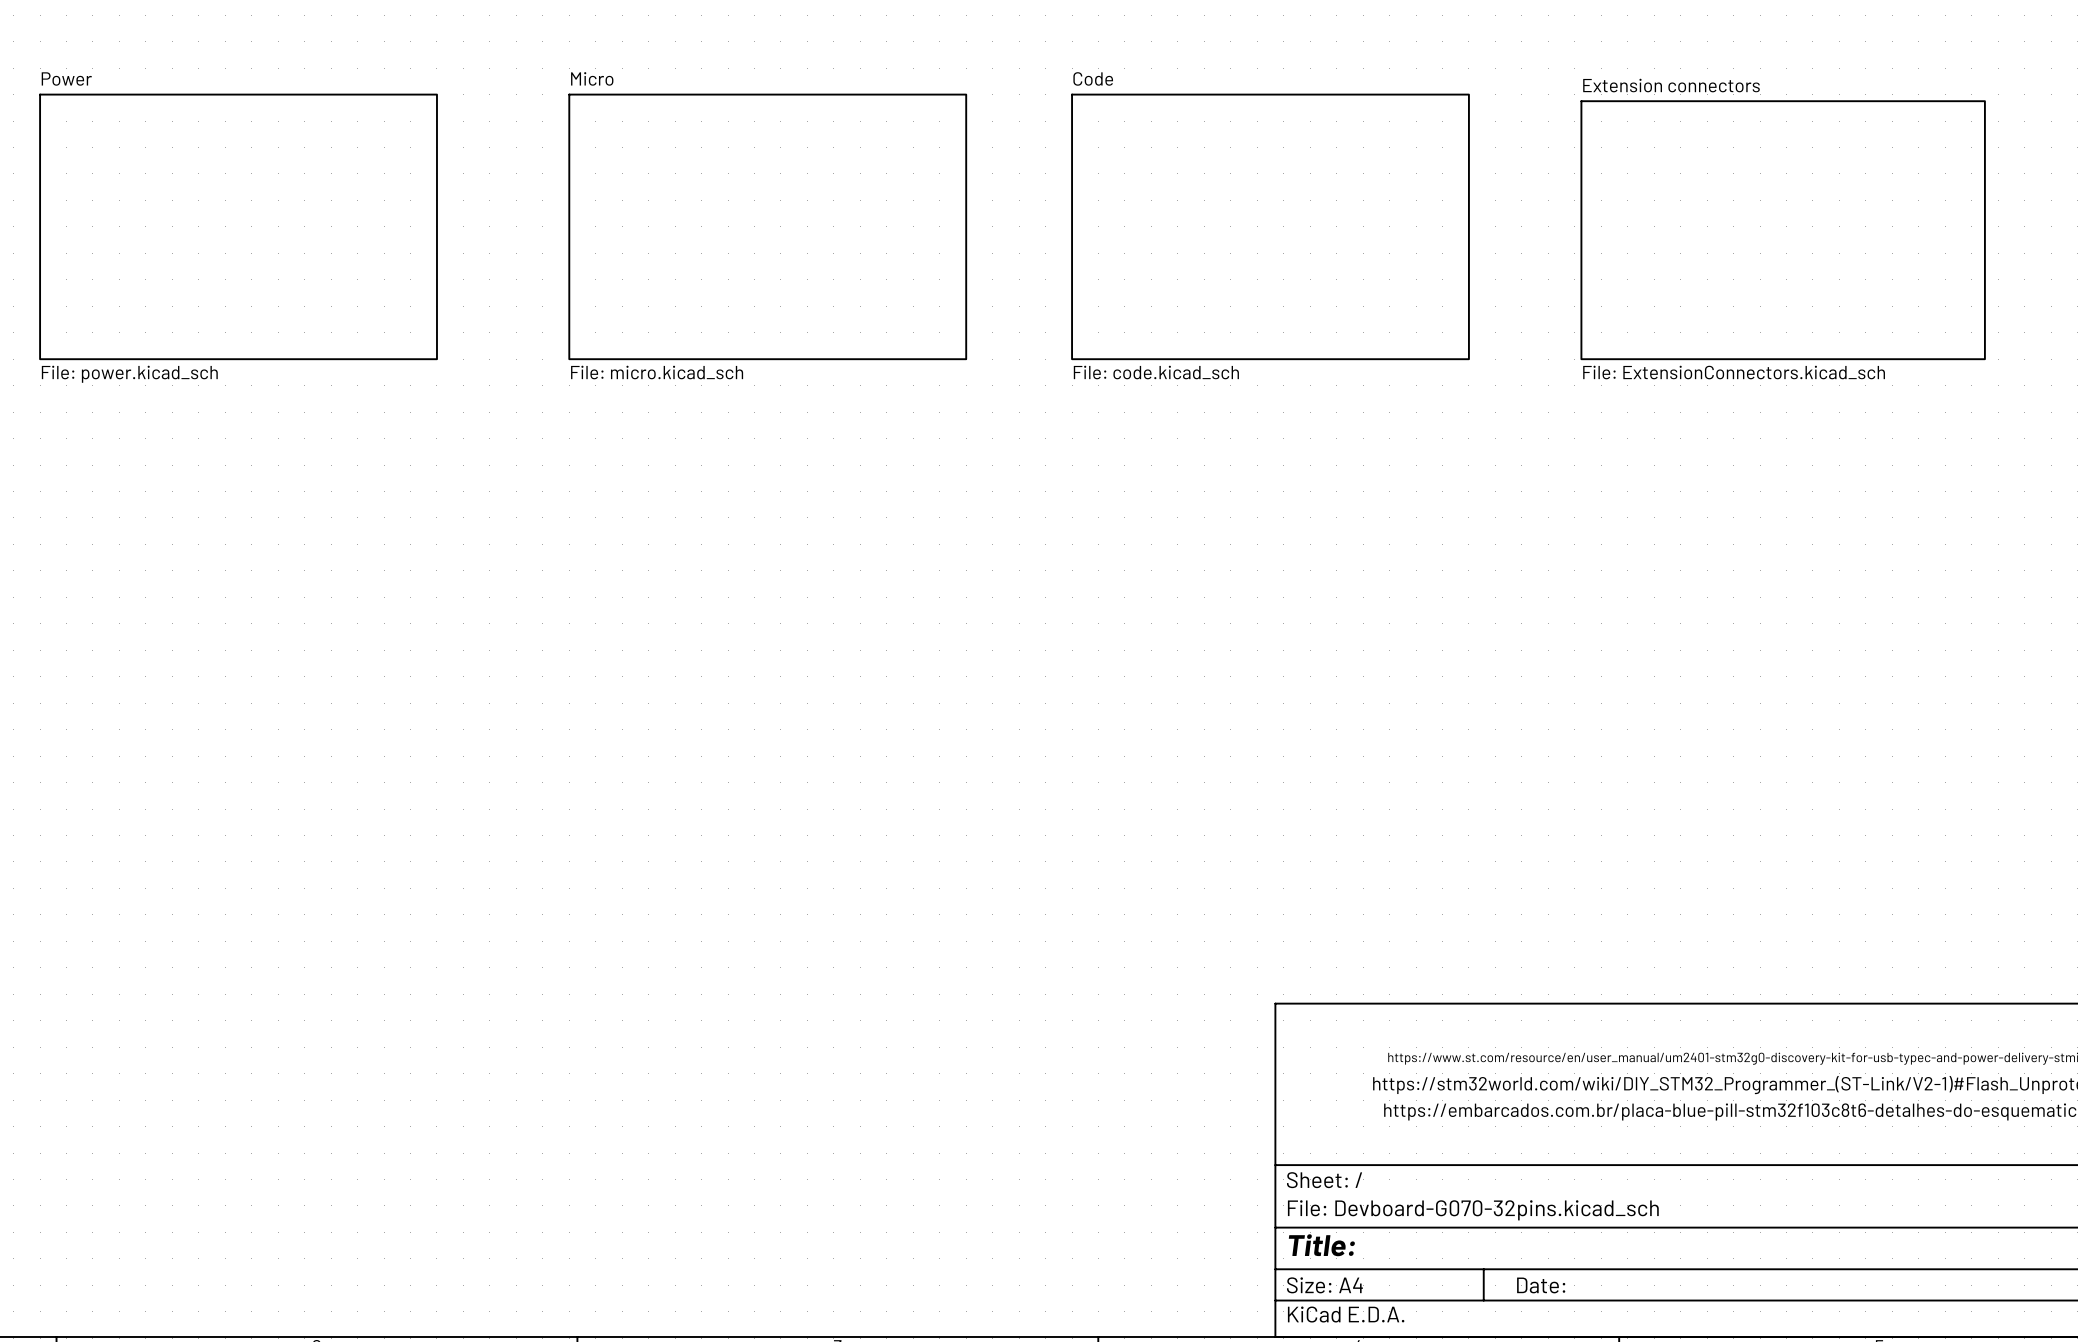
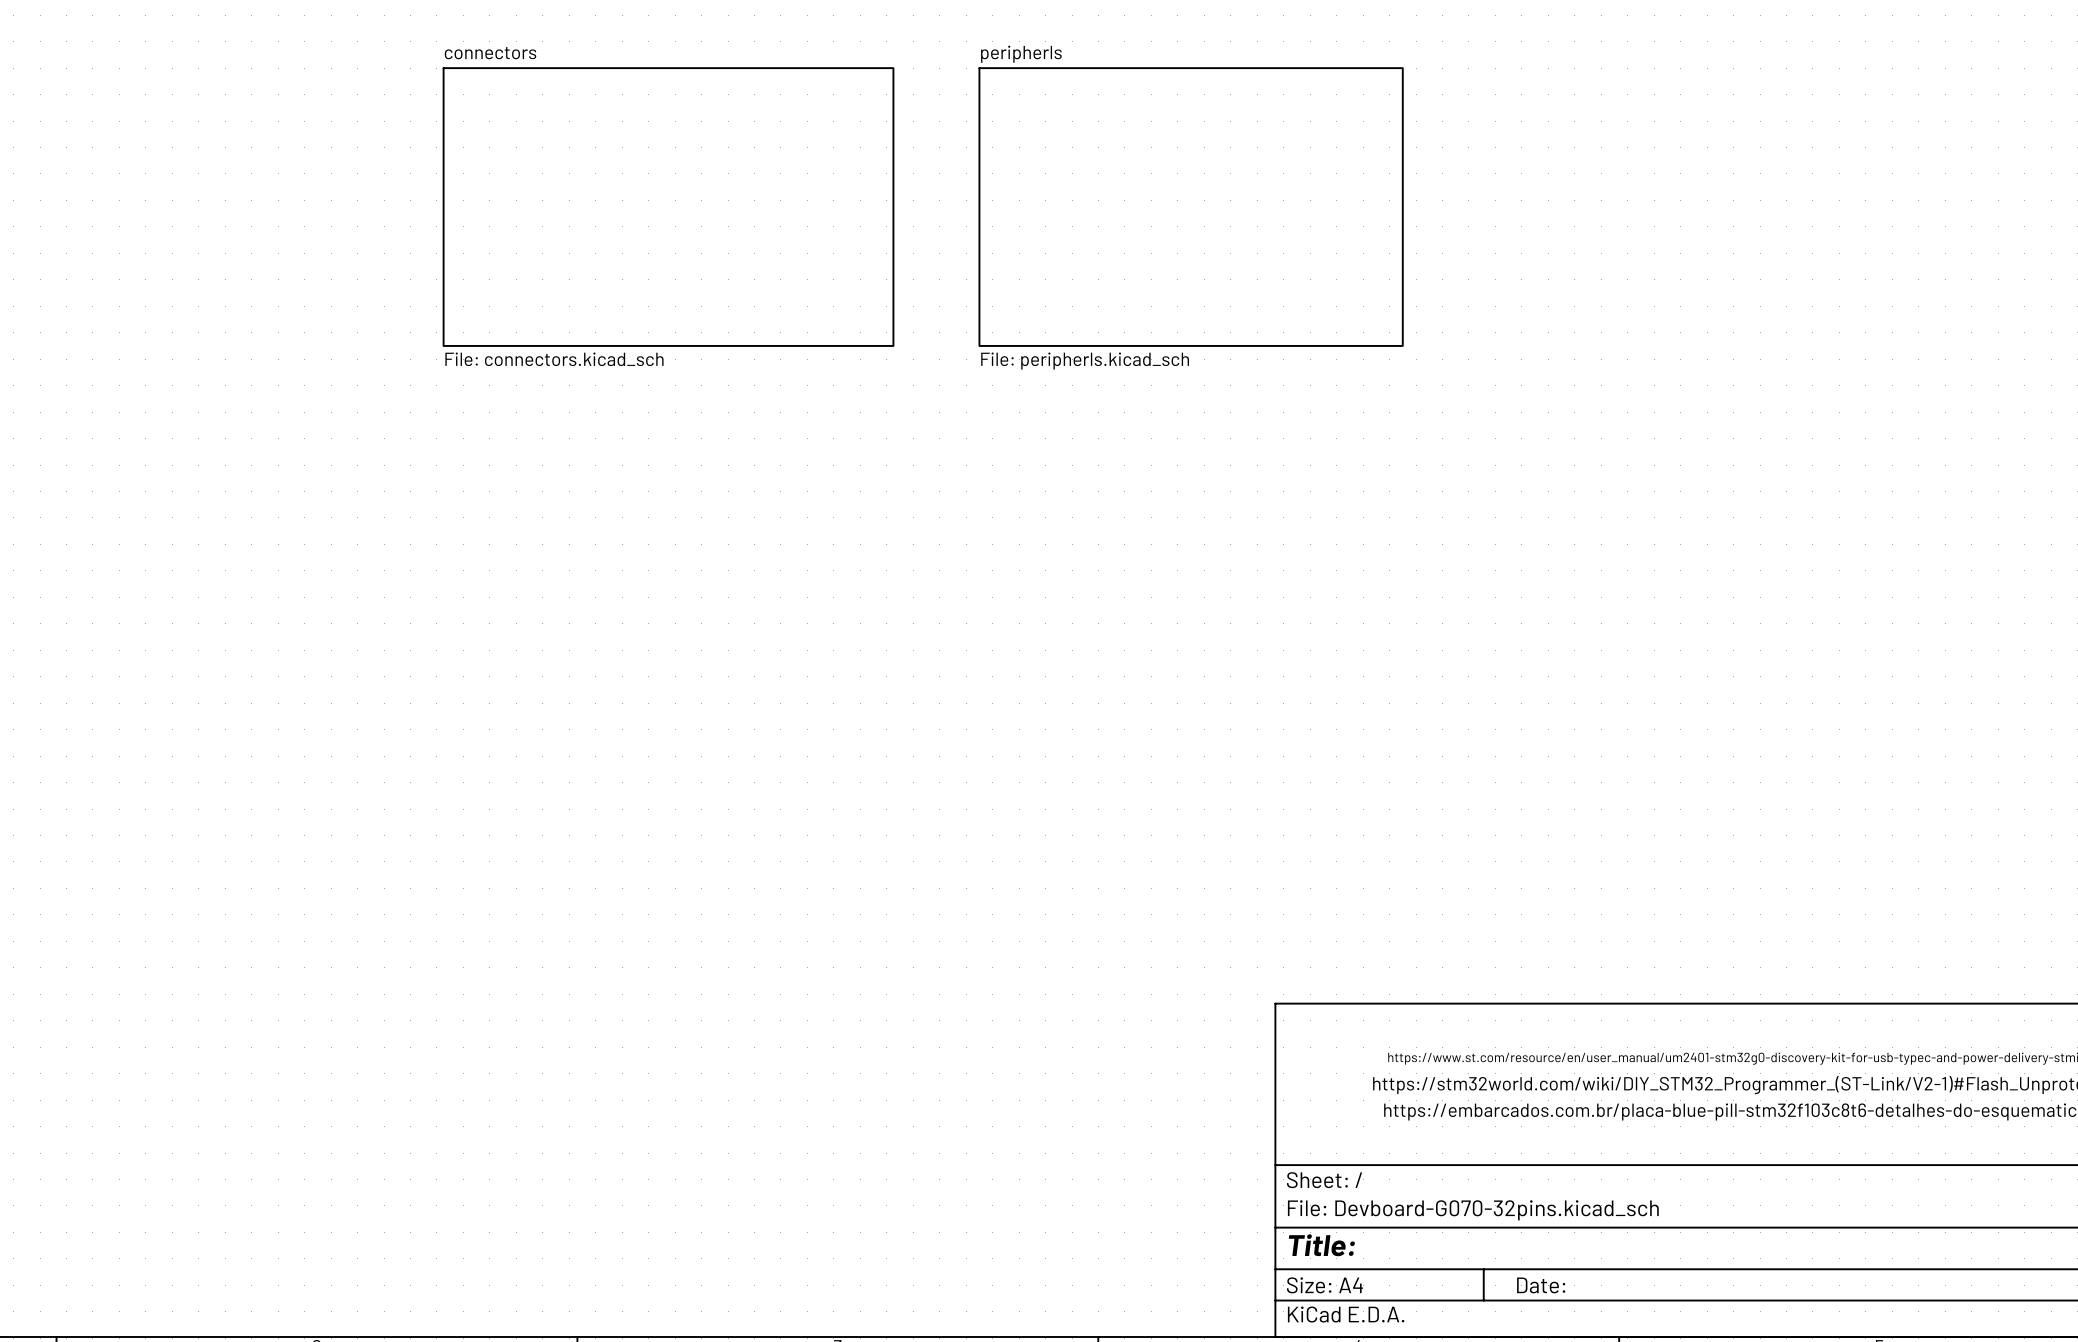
sheet connectors: none -> File: connectors.kicad_sch (668, 207)
sheet peripherls: none -> File: peripherls.kicad_sch (1191, 207)
sheet Power: File: power.kicad_sch (238, 226) -> none
sheet Micro: File: micro.kicad_sch (767, 226) -> none
sheet Code: File: code.kicad_sch (1270, 226) -> none
sheet Extension connectors: File: ExtensionConnectors.kicad_sch (1783, 230) -> none

